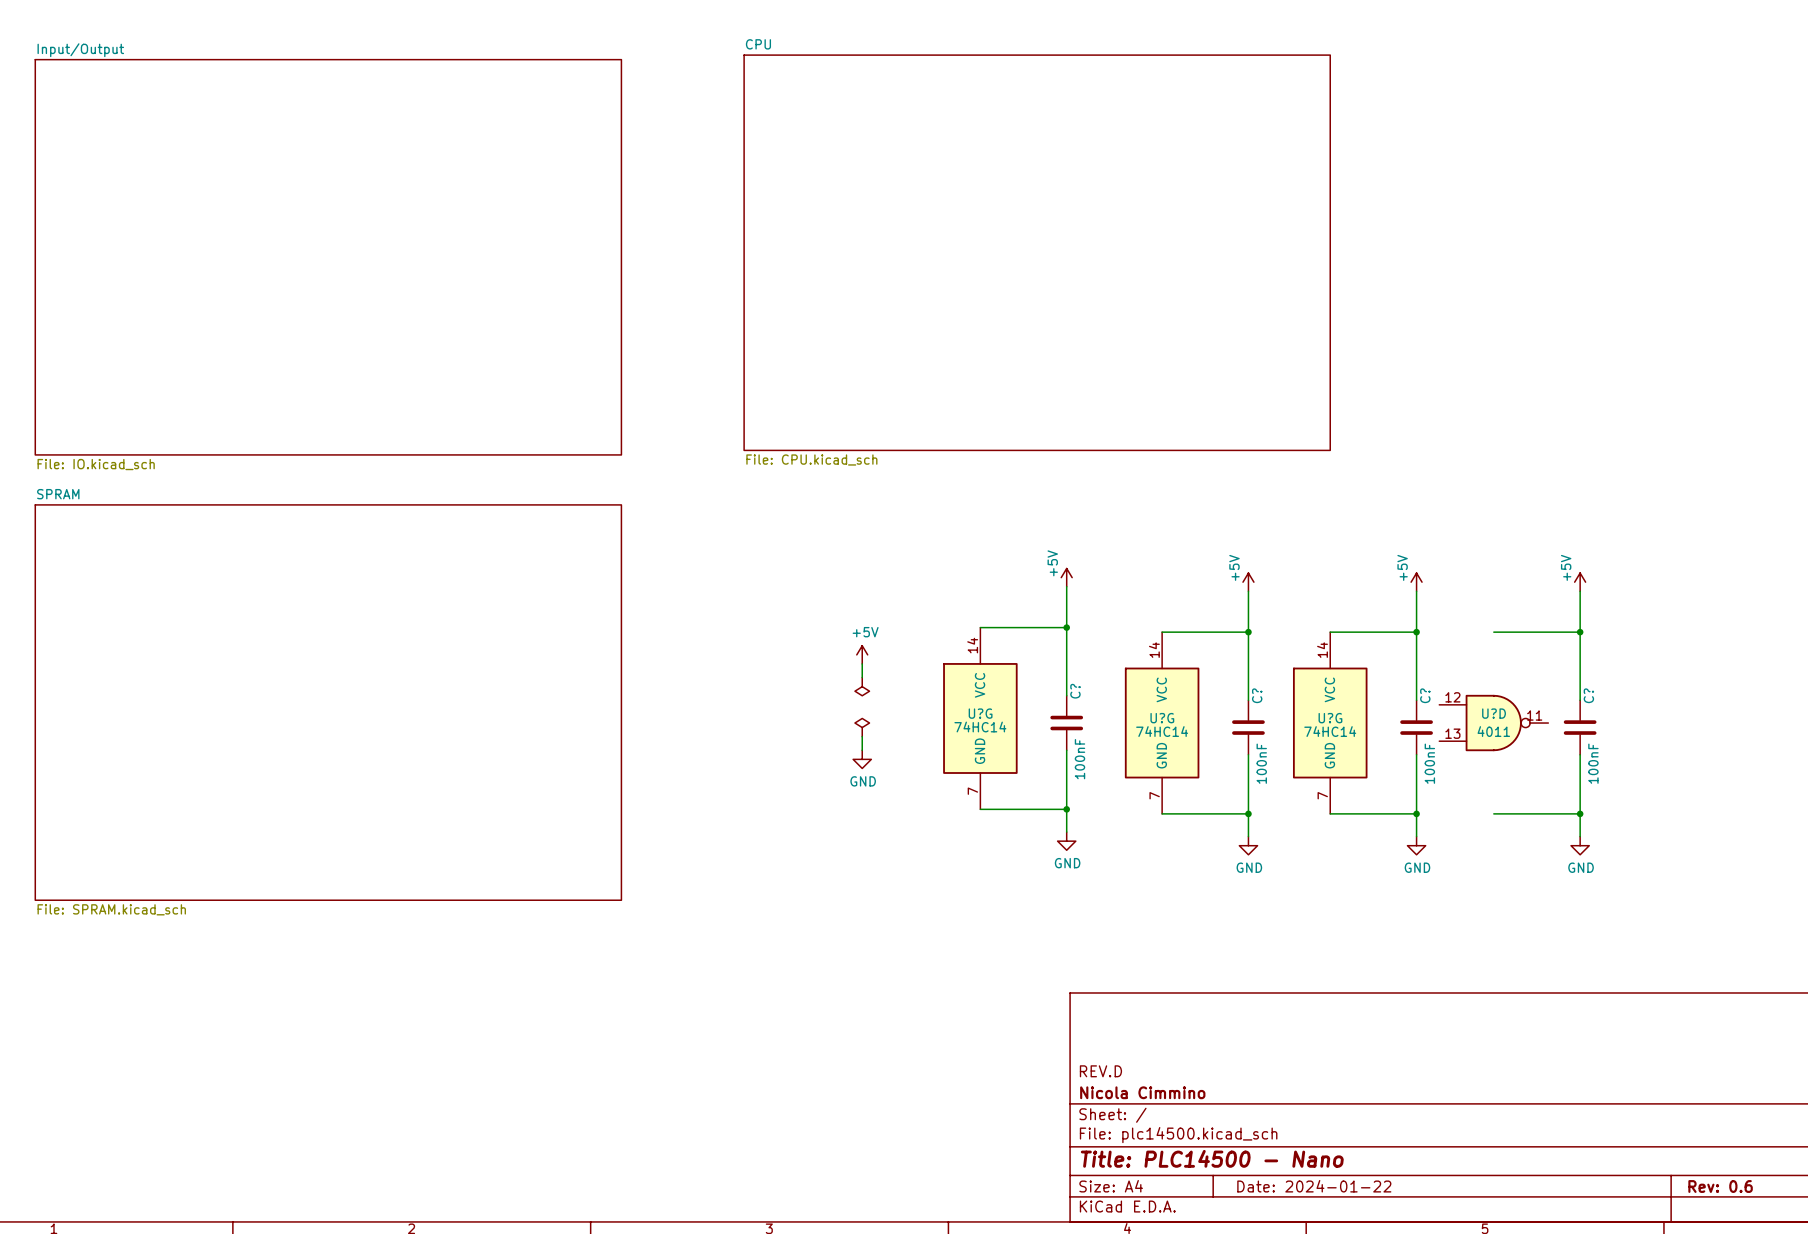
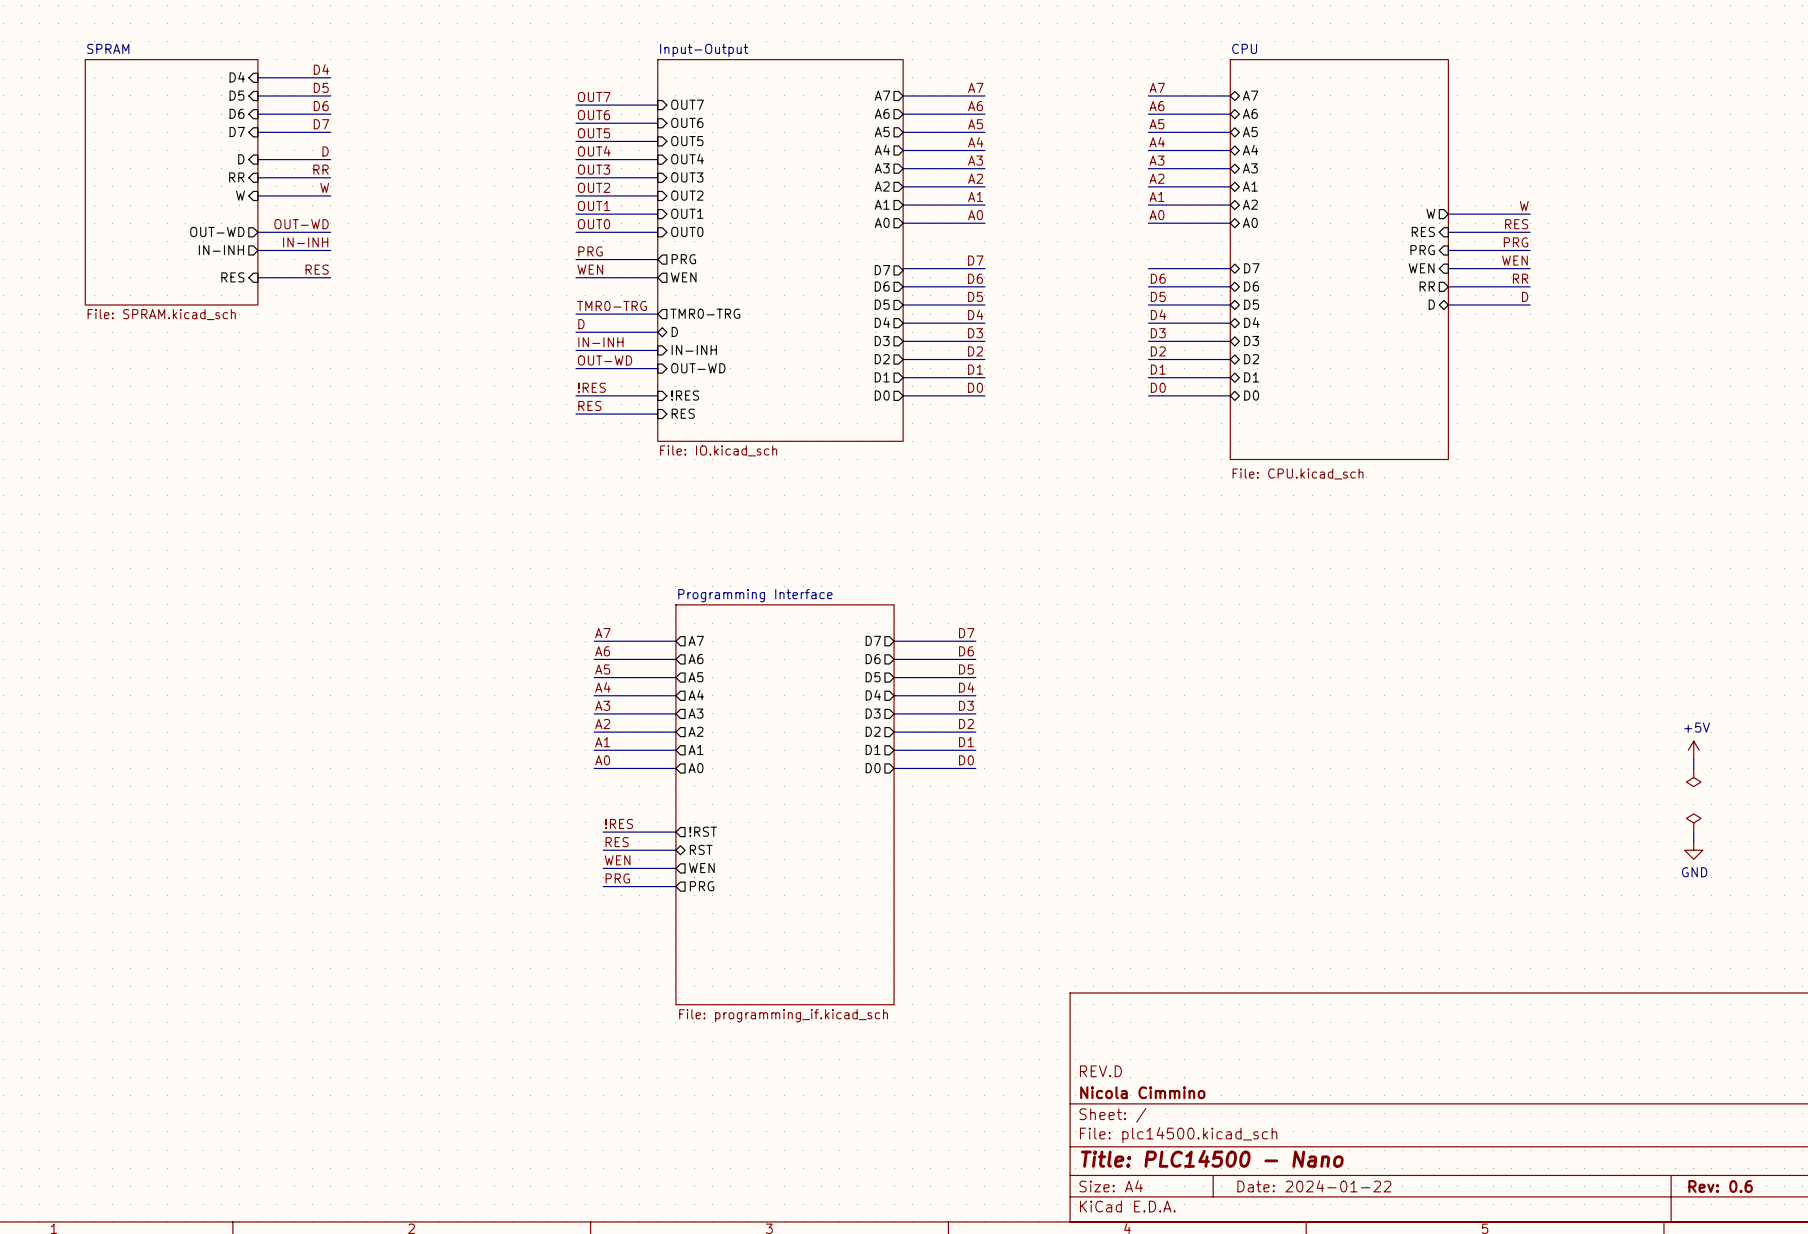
label: none -> D4 (321, 69)
sheet pin: none -> D4 (237, 77)
wire: none -> (257, 77) (330, 77)
label: none -> D5 (321, 87)
label: none -> A7 (975, 87)
label: none -> A7 (1157, 87)
sheet pin: none -> D5 (237, 95)
wire: none -> (257, 95) (330, 95)
sheet pin: none -> A7 (882, 95)
wire: none -> (903, 95) (984, 95)
wire: none -> (1148, 95) (1230, 95)
sheet pin: none -> A7 (1250, 95)
label: none -> OUT7 (594, 96)
sheet pin: none -> OUT7 (687, 104)
wire: none -> (575, 105) (657, 105)
label: none -> D6 (321, 106)
label: none -> A6 (975, 106)
label: none -> A6 (1156, 106)
sheet pin: none -> D6 (237, 113)
sheet pin: none -> A6 (882, 113)
sheet pin: none -> A6 (1250, 113)
wire: none -> (257, 114) (330, 114)
wire: none -> (903, 114) (984, 114)
wire: none -> (1148, 114) (1230, 114)
label: none -> OUT6 (594, 115)
sheet pin: none -> OUT6 (687, 122)
wire: none -> (575, 123) (657, 123)
label: none -> D7 (321, 124)
label: none -> A5 (975, 124)
label: none -> A5 (1156, 124)
sheet pin: none -> D7 (237, 132)
wire: none -> (257, 132) (330, 132)
sheet pin: none -> A5 (882, 132)
wire: none -> (903, 132) (984, 132)
wire: none -> (1148, 132) (1230, 132)
sheet pin: none -> A5 (1250, 132)
label: none -> OUT5 (594, 133)
wire: none -> (575, 141) (657, 141)
sheet pin: none -> OUT5 (687, 141)
label: none -> A4 (975, 142)
label: none -> A4 (1157, 142)
sheet pin: none -> A4 (882, 149)
sheet pin: none -> A4 (1250, 149)
wire: none -> (903, 150) (984, 150)
wire: none -> (1148, 150) (1230, 150)
label: none -> D (325, 151)
label: none -> OUT4 (594, 151)
sheet pin: none -> D (241, 159)
wire: none -> (257, 159) (330, 159)
wire: none -> (575, 159) (657, 159)
sheet pin: none -> OUT4 (687, 159)
label: none -> A3 (975, 160)
label: none -> A3 (1156, 160)
sheet pin: none -> A3 (882, 168)
wire: none -> (903, 168) (984, 168)
wire: none -> (1148, 168) (1230, 168)
sheet pin: none -> A3 (1250, 168)
label: none -> RR (321, 169)
label: none -> OUT3 (594, 169)
sheet pin: none -> RR (236, 177)
wire: none -> (257, 177) (330, 177)
wire: none -> (575, 177) (657, 177)
sheet pin: none -> OUT3 (687, 177)
label: none -> A2 (975, 178)
label: none -> A2 (1156, 178)
sheet SPRAM: none -> File: SPRAM.kicad_sch (171, 182)
sheet pin: none -> A2 (882, 186)
wire: none -> (903, 186) (984, 186)
wire: none -> (1148, 186) (1230, 186)
sheet pin: none -> A1 (1250, 186)
label: none -> W (324, 187)
label: none -> OUT2 (594, 187)
sheet pin: none -> W (240, 195)
wire: none -> (257, 195) (330, 195)
wire: none -> (575, 195) (657, 195)
sheet pin: none -> OUT2 (687, 195)
label: none -> A1 (975, 196)
label: none -> A1 (1156, 196)
sheet pin: none -> A1 (882, 204)
sheet pin: none -> A2 (1250, 204)
wire: none -> (903, 205) (984, 205)
wire: none -> (1148, 205) (1230, 205)
label: none -> OUT1 (594, 206)
label: none -> W (1524, 206)
sheet pin: none -> OUT1 (687, 213)
sheet pin: none -> W (1430, 213)
wire: none -> (575, 214) (657, 214)
wire: none -> (1448, 214) (1530, 214)
label: none -> A0 (975, 215)
label: none -> A0 (1156, 215)
sheet pin: none -> A0 (882, 222)
sheet pin: none -> A0 (1250, 222)
wire: none -> (903, 223) (984, 223)
wire: none -> (1148, 223) (1230, 223)
label: none -> OUT-WD (301, 224)
label: none -> OUT0 (594, 224)
label: none -> RES (1516, 224)
sheet pin: none -> OUT-WD (217, 231)
sheet pin: none -> OUT0 (687, 231)
sheet pin: none -> RES (1423, 231)
wire: none -> (257, 232) (330, 232)
wire: none -> (575, 232) (657, 232)
wire: none -> (1448, 232) (1530, 232)
label: none -> IN-INH (305, 242)
label: none -> PRG (1516, 242)
sheet pin: none -> IN-INH (221, 250)
wire: none -> (257, 250) (330, 250)
sheet Input-Output: none -> File: IO.kicad_sch (780, 250)
sheet pin: none -> PRG (1422, 250)
wire: none -> (1448, 250) (1530, 250)
label: none -> PRG (590, 251)
sheet CPU: File: CPU.kicad_sch (1037, 252) -> none
sheet Input/Output: File: IO.kicad_sch (328, 257) -> none
wire: none -> (575, 259) (657, 259)
sheet pin: none -> PRG (683, 259)
sheet CPU: none -> File: CPU.kicad_sch (1339, 259)
label: none -> D7 (975, 260)
label: none -> WEN (1514, 260)
wire: none -> (903, 268) (984, 268)
wire: none -> (1148, 268) (1230, 268)
sheet pin: none -> D7 (1251, 268)
sheet pin: none -> WEN (1421, 268)
wire: none -> (1448, 268) (1530, 268)
label: none -> RES (317, 269)
label: none -> WEN (590, 269)
sheet pin: none -> D7 (882, 270)
sheet pin: none -> RES (232, 277)
wire: none -> (257, 277) (330, 277)
wire: none -> (575, 277) (657, 277)
sheet pin: none -> WEN (683, 277)
label: none -> D6 (975, 278)
label: none -> D6 (1158, 278)
label: none -> RR (1520, 278)
sheet pin: none -> D6 (882, 286)
wire: none -> (903, 286) (984, 286)
wire: none -> (1148, 286) (1230, 286)
sheet pin: none -> D6 (1251, 286)
sheet pin: none -> RR (1427, 286)
wire: none -> (1448, 286) (1530, 286)
label: none -> D5 (975, 296)
label: none -> D5 (1158, 296)
label: none -> D (1525, 296)
sheet pin: none -> D5 (882, 304)
sheet pin: none -> D5 (1251, 304)
sheet pin: none -> D (1431, 304)
label: none -> TMR0-TRG (611, 305)
wire: none -> (903, 305) (984, 305)
wire: none -> (1148, 305) (1230, 305)
wire: none -> (1448, 305) (1530, 305)
sheet pin: none -> TMR0-TRG (705, 313)
wire: none -> (575, 314) (657, 314)
label: none -> D4 (975, 314)
label: none -> D4 (1158, 314)
sheet pin: none -> D4 (882, 322)
sheet pin: none -> D4 (1251, 322)
wire: none -> (903, 323) (984, 323)
wire: none -> (1148, 323) (1230, 323)
label: none -> D (581, 324)
sheet pin: none -> D (674, 331)
wire: none -> (575, 332) (657, 332)
label: none -> D3 (975, 333)
label: none -> D3 (1158, 333)
sheet pin: none -> D3 (882, 341)
wire: none -> (903, 341) (984, 341)
wire: none -> (1148, 341) (1230, 341)
sheet pin: none -> D3 (1251, 341)
label: none -> IN-INH (600, 342)
wire: none -> (575, 350) (657, 350)
sheet pin: none -> IN-INH (694, 350)
label: none -> D2 (975, 351)
label: none -> D2 (1158, 351)
sheet pin: none -> D2 (882, 359)
wire: none -> (903, 359) (984, 359)
wire: none -> (1148, 359) (1230, 359)
sheet pin: none -> D2 (1251, 359)
label: none -> OUT-WD (605, 360)
wire: none -> (575, 368) (657, 368)
sheet pin: none -> OUT-WD (698, 368)
label: none -> D1 (975, 369)
label: none -> D1 (1158, 369)
sheet pin: none -> D1 (882, 377)
wire: none -> (903, 377) (984, 377)
wire: none -> (1148, 377) (1230, 377)
sheet pin: none -> D1 (1251, 377)
label: none -> !RES (591, 387)
label: none -> D0 (975, 387)
label: none -> D0 (1158, 387)
wire: none -> (575, 395) (657, 395)
sheet pin: none -> !RES (685, 395)
sheet pin: none -> D0 (882, 395)
wire: none -> (903, 395) (984, 395)
wire: none -> (1148, 395) (1230, 395)
sheet pin: none -> D0 (1251, 395)
label: none -> RES (589, 405)
sheet pin: none -> RES (683, 413)
wire: none -> (575, 414) (657, 414)
power symbol: +5V (1066, 577) -> none
power symbol: +5V (1248, 582) -> none
power symbol: +5V (1416, 582) -> none
power symbol: +5V (1580, 582) -> none
wire: (1066, 586) (1066, 695) -> none
wire: (1248, 591) (1248, 700) -> none
wire: (1416, 591) (1416, 700) -> none
wire: (1580, 591) (1580, 700) -> none
wire: (980, 627) (1066, 627) -> none
junction: (1066, 627) -> none
wire: (1162, 632) (1248, 632) -> none
junction: (1248, 632) -> none
wire: (1330, 632) (1416, 632) -> none
junction: (1416, 632) -> none
wire: (1493, 632) (1580, 632) -> none
junction: (1580, 632) -> none
label: none -> A7 (602, 633)
label: none -> D7 (966, 633)
sheet pin: none -> A7 (696, 640)
sheet pin: none -> D7 (873, 640)
wire: none -> (594, 641) (675, 641)
wire: none -> (894, 641) (975, 641)
label: none -> A6 (602, 651)
label: none -> D6 (966, 651)
power symbol: +5V (862, 654) -> none
wire: none -> (594, 659) (675, 659)
sheet pin: none -> A6 (695, 659)
sheet pin: none -> D6 (873, 659)
wire: none -> (894, 659) (975, 659)
wire: (862, 663) (862, 677) -> none
label: none -> A5 (602, 669)
label: none -> D5 (966, 669)
wire: none -> (594, 677) (675, 677)
sheet pin: none -> A5 (695, 677)
sheet pin: none -> D5 (873, 677)
wire: none -> (894, 677) (975, 677)
power symbol: (862, 686) -> none
label: none -> A4 (602, 687)
label: none -> D4 (966, 687)
wire: none -> (594, 695) (675, 695)
sheet pin: none -> A4 (696, 695)
sheet pin: none -> D4 (873, 695)
wire: none -> (894, 695) (975, 695)
sheet SPRAM: File: SPRAM.kicad_sch (328, 702) -> none
label: none -> A3 (602, 705)
label: none -> D3 (966, 705)
wire: none -> (594, 713) (675, 713)
sheet pin: none -> A3 (695, 713)
sheet pin: none -> D3 (873, 713)
wire: none -> (894, 713) (975, 713)
U?G: 74HC14 (980, 718) -> none
C?: 100nF (1066, 723) -> none
U?G: 74HC14 (1162, 723) -> none
U?G: 74HC14 (1330, 723) -> none
U?D: 4011 (1493, 723) -> none
label: none -> A2 (602, 724)
label: none -> D2 (966, 724)
power symbol: (862, 727) -> none
C?: 100nF (1248, 727) -> none
C?: 100nF (1416, 727) -> none
C?: 100nF (1580, 727) -> none
sheet pin: none -> A2 (695, 731)
sheet pin: none -> D2 (873, 731)
wire: none -> (594, 732) (675, 732)
wire: none -> (894, 732) (975, 732)
wire: (862, 736) (862, 750) -> none
label: none -> A1 (602, 742)
label: none -> D1 (966, 742)
sheet pin: none -> A1 (695, 749)
sheet pin: none -> D1 (873, 749)
wire: none -> (594, 750) (675, 750)
wire: none -> (894, 750) (975, 750)
wire: (1066, 750) (1066, 832) -> none
power symbol: none -> +5V (1693, 750)
wire: (1248, 754) (1248, 836) -> none
wire: (1416, 754) (1416, 836) -> none
wire: (1580, 754) (1580, 836) -> none
power symbol: GND (862, 759) -> none
wire: none -> (1693, 759) (1693, 768)
label: none -> A0 (602, 760)
label: none -> D0 (966, 760)
wire: none -> (594, 768) (675, 768)
sheet pin: none -> A0 (695, 768)
sheet pin: none -> D0 (873, 768)
wire: none -> (894, 768) (975, 768)
power symbol: none -> (1693, 777)
sheet Programming Interface: none -> File: programming_if.kicad_sch (784, 804)
wire: (980, 809) (1066, 809) -> none
junction: (1066, 809) -> none
wire: (1162, 813) (1248, 813) -> none
junction: (1248, 813) -> none
wire: (1330, 813) (1416, 813) -> none
junction: (1416, 813) -> none
wire: (1493, 813) (1580, 813) -> none
junction: (1580, 813) -> none
power symbol: none -> (1693, 822)
label: none -> !RES (619, 823)
sheet pin: none -> !RST (703, 831)
wire: none -> (603, 832) (675, 832)
wire: none -> (1693, 832) (1693, 841)
power symbol: GND (1066, 841) -> none
label: none -> RES (617, 842)
power symbol: GND (1248, 845) -> none
power symbol: GND (1416, 845) -> none
power symbol position: GND (1580, 845) -> GND (1693, 850)
sheet pin: none -> RST (701, 849)
wire: none -> (603, 850) (675, 850)
label: none -> WEN (617, 860)
wire: none -> (603, 868) (675, 868)
sheet pin: none -> WEN (701, 868)
label: none -> PRG (617, 878)
wire: none -> (603, 886) (675, 886)
sheet pin: none -> PRG (702, 886)

